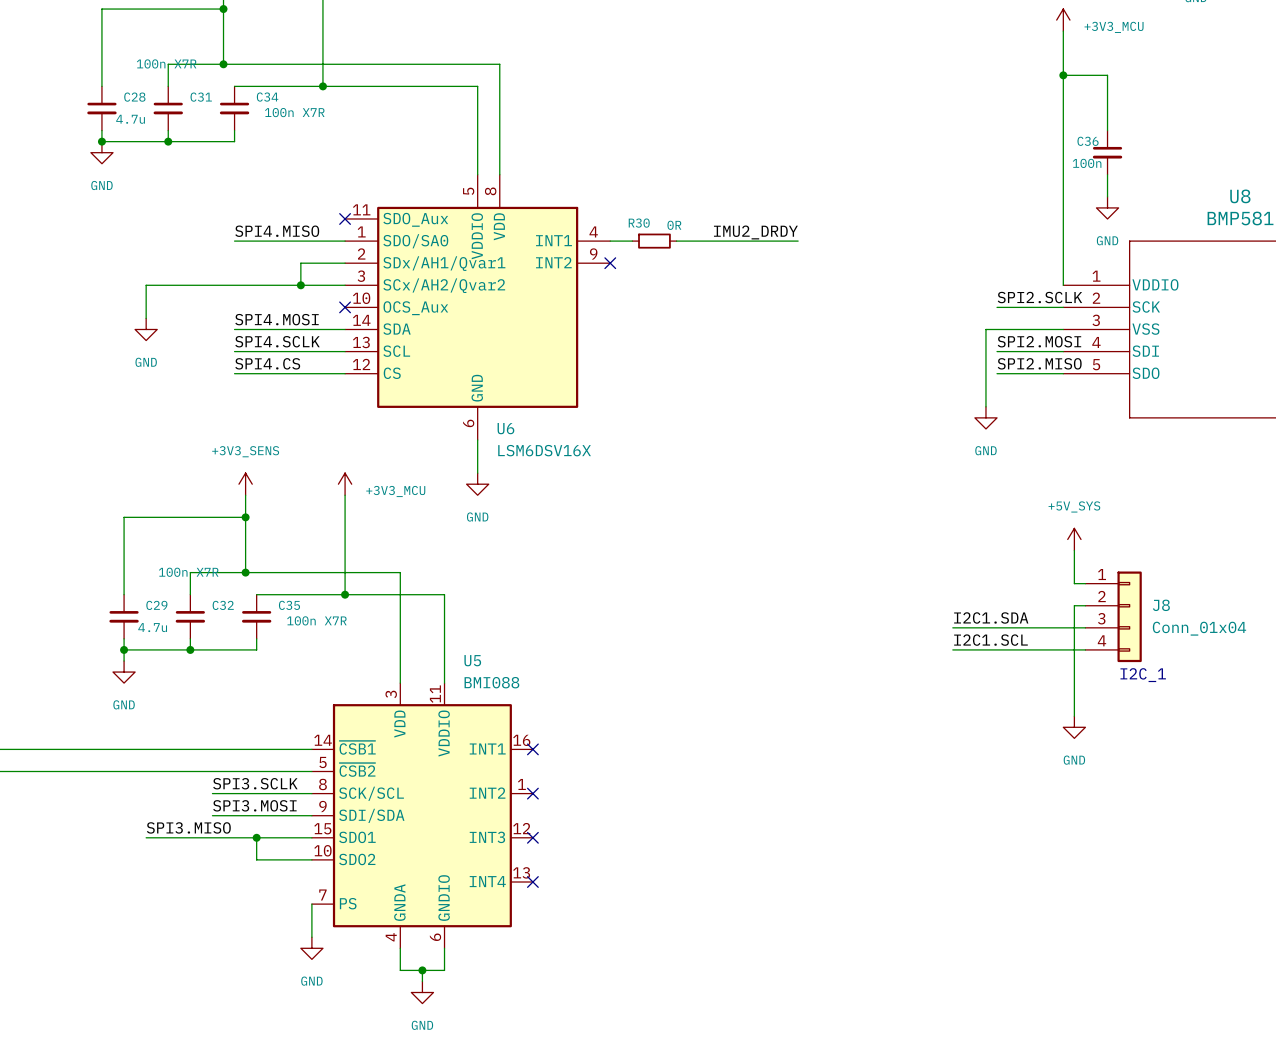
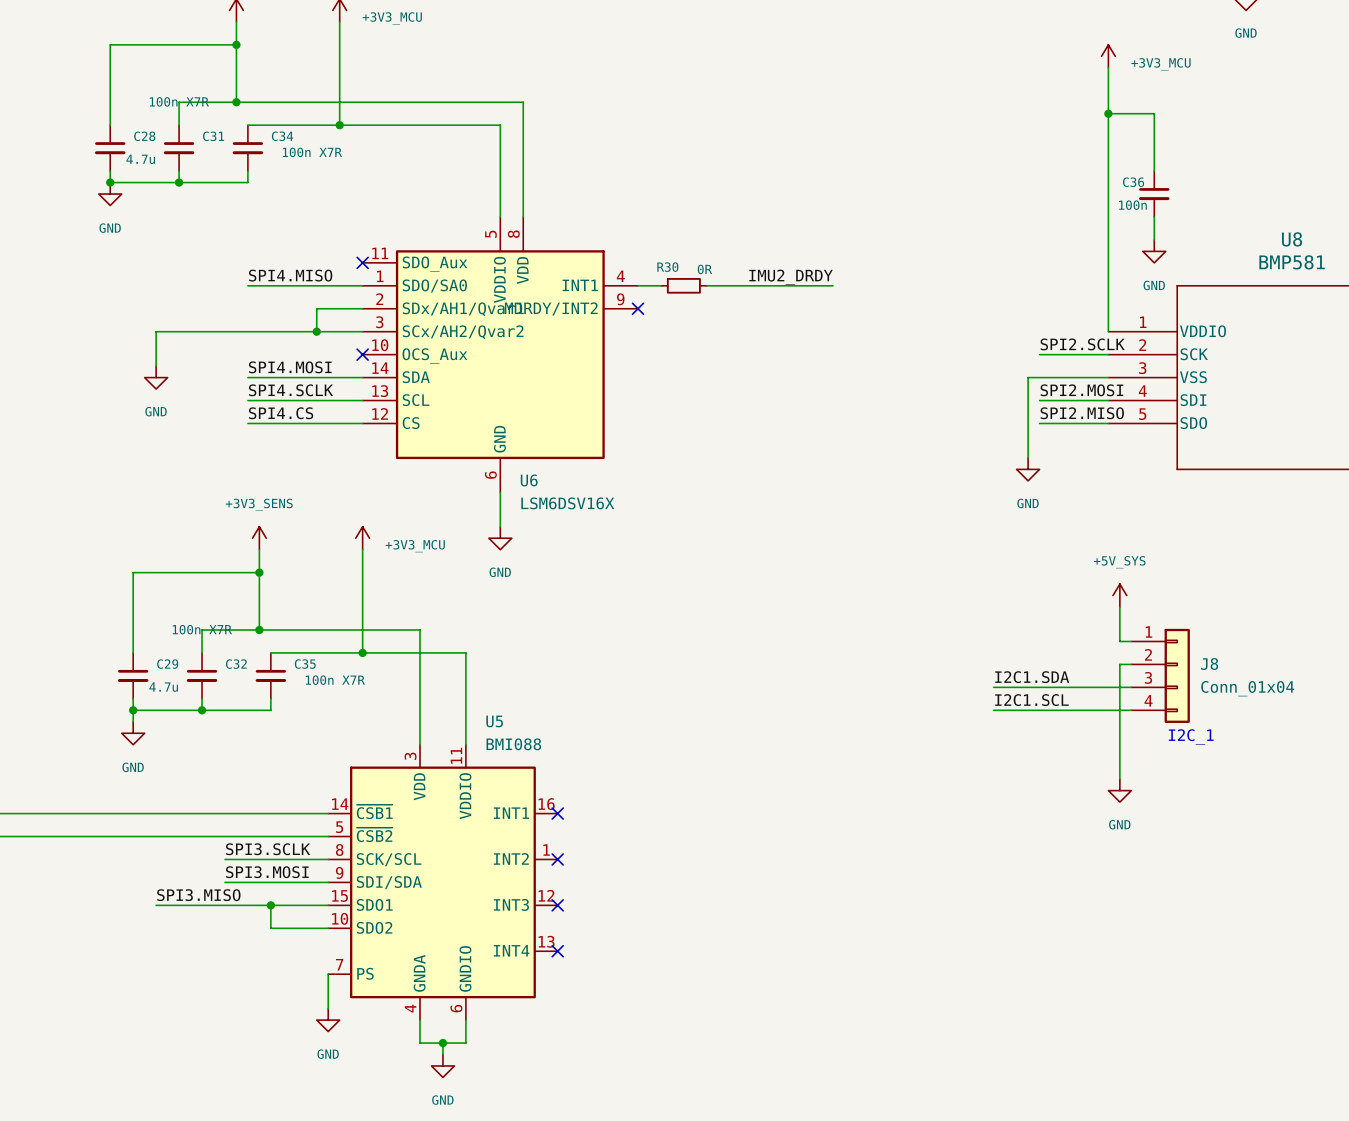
U6 pin name: INT2 (553, 262) -> MDRDY/INT2 (551, 308)

